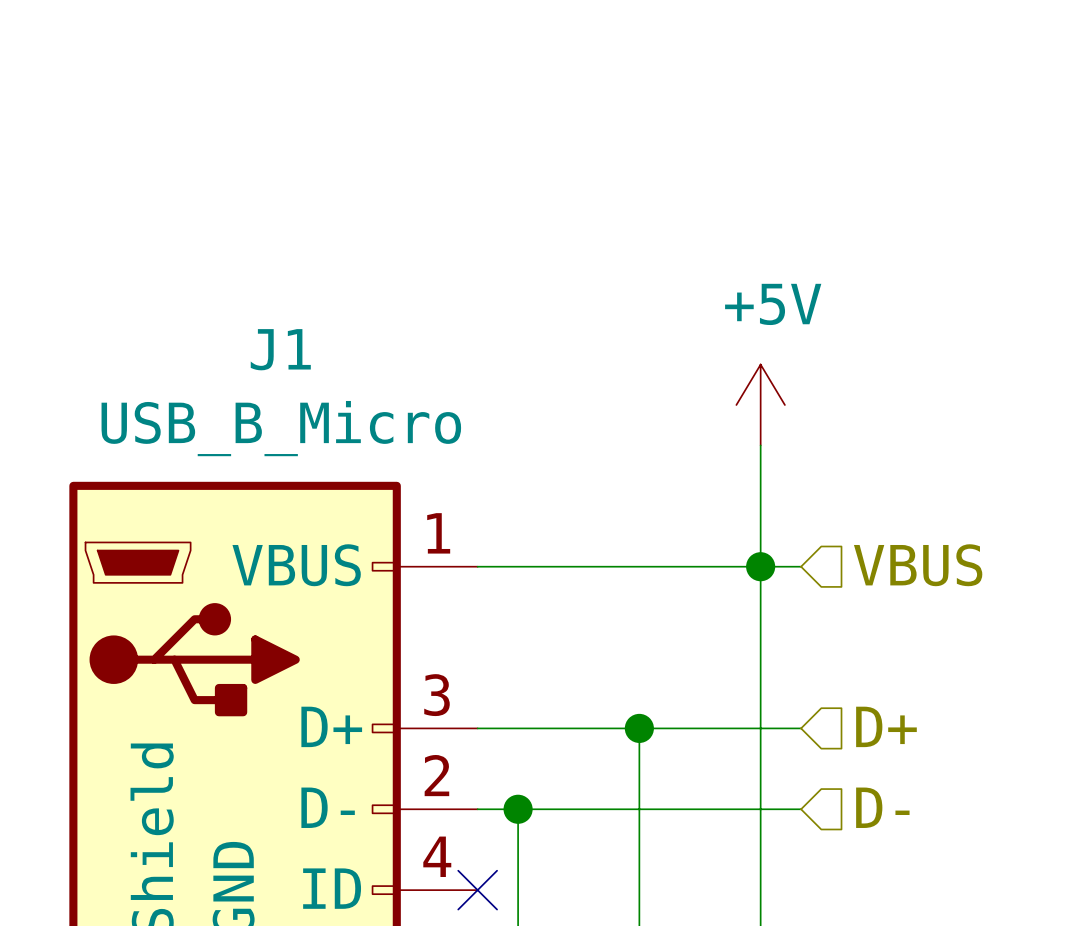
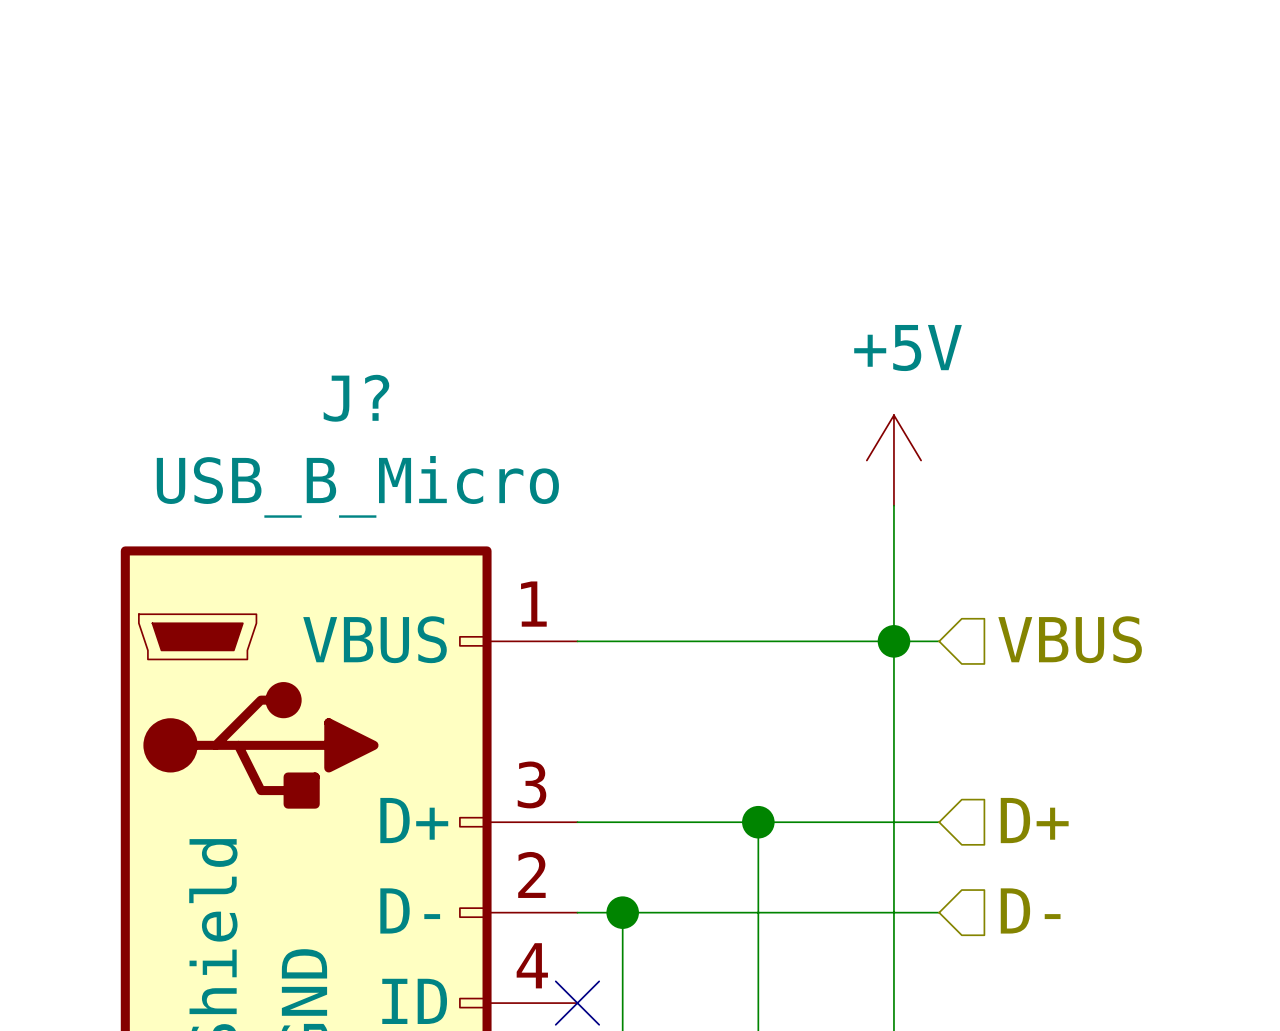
J1 name: J1 (280, 349) -> J? (356, 398)

